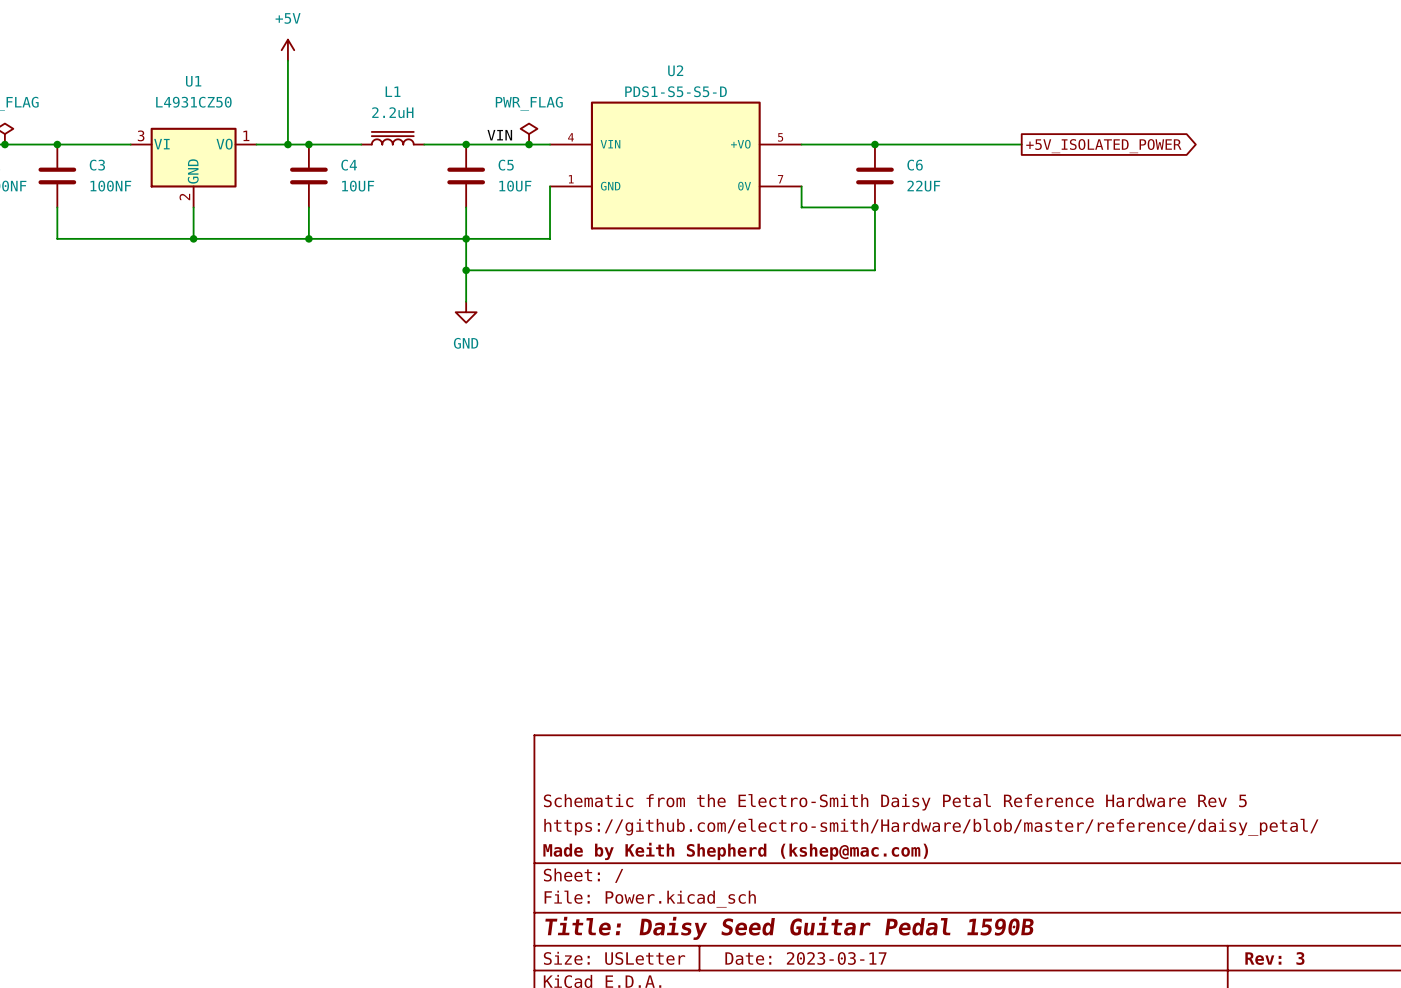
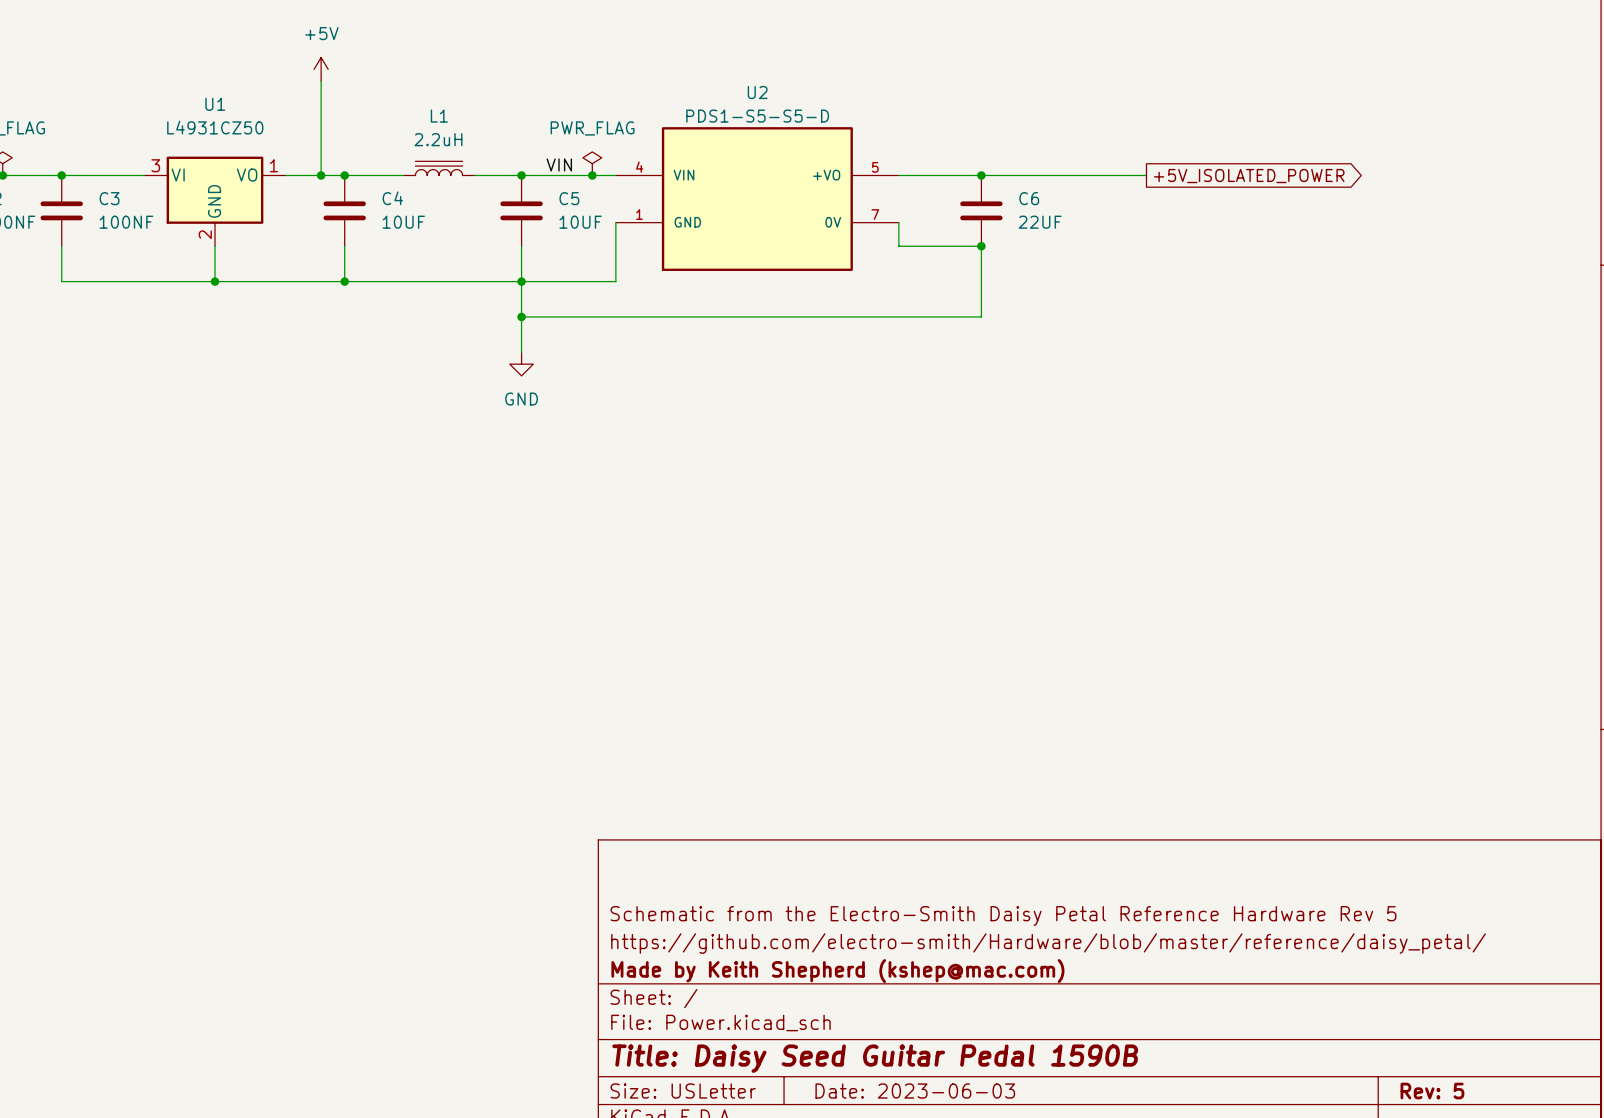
title block: Date: 2023-03-17 (805, 958) -> Date: 2023-06-03 (915, 1091)
title block: Rev: 3 (1274, 958) -> Rev: 5 (1432, 1091)

